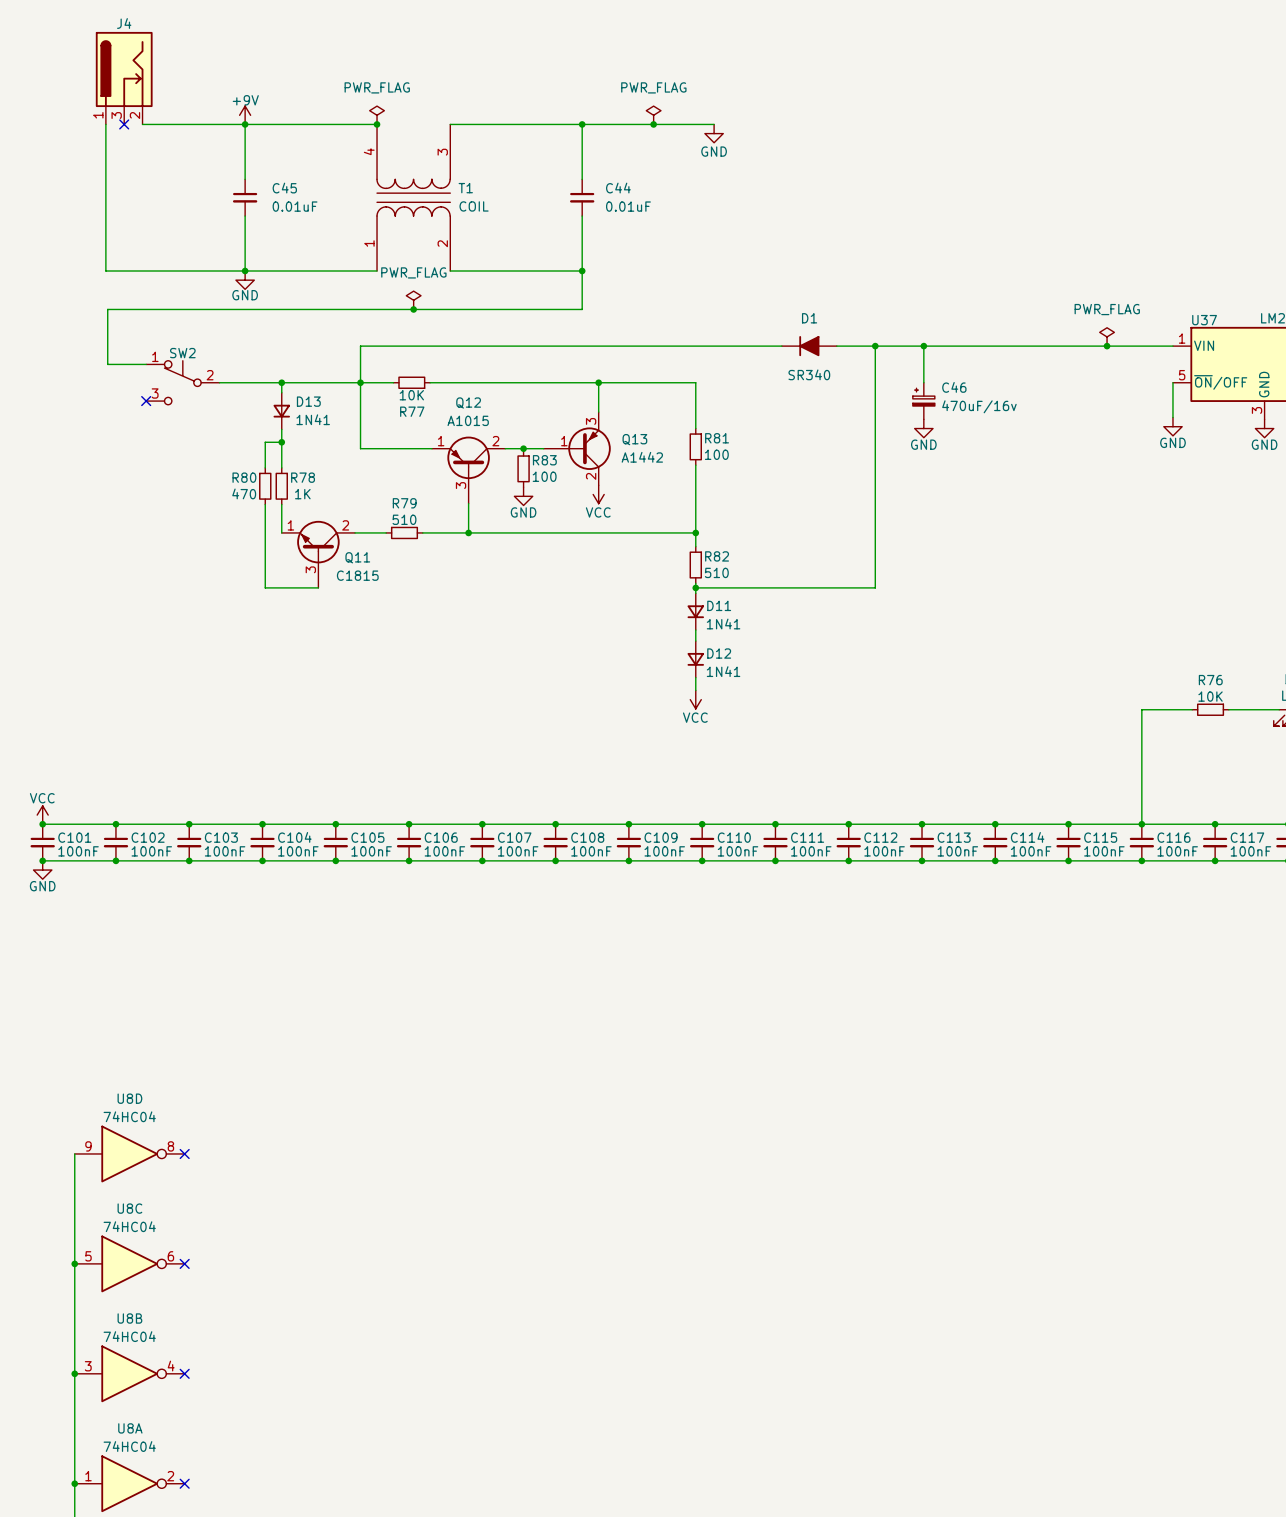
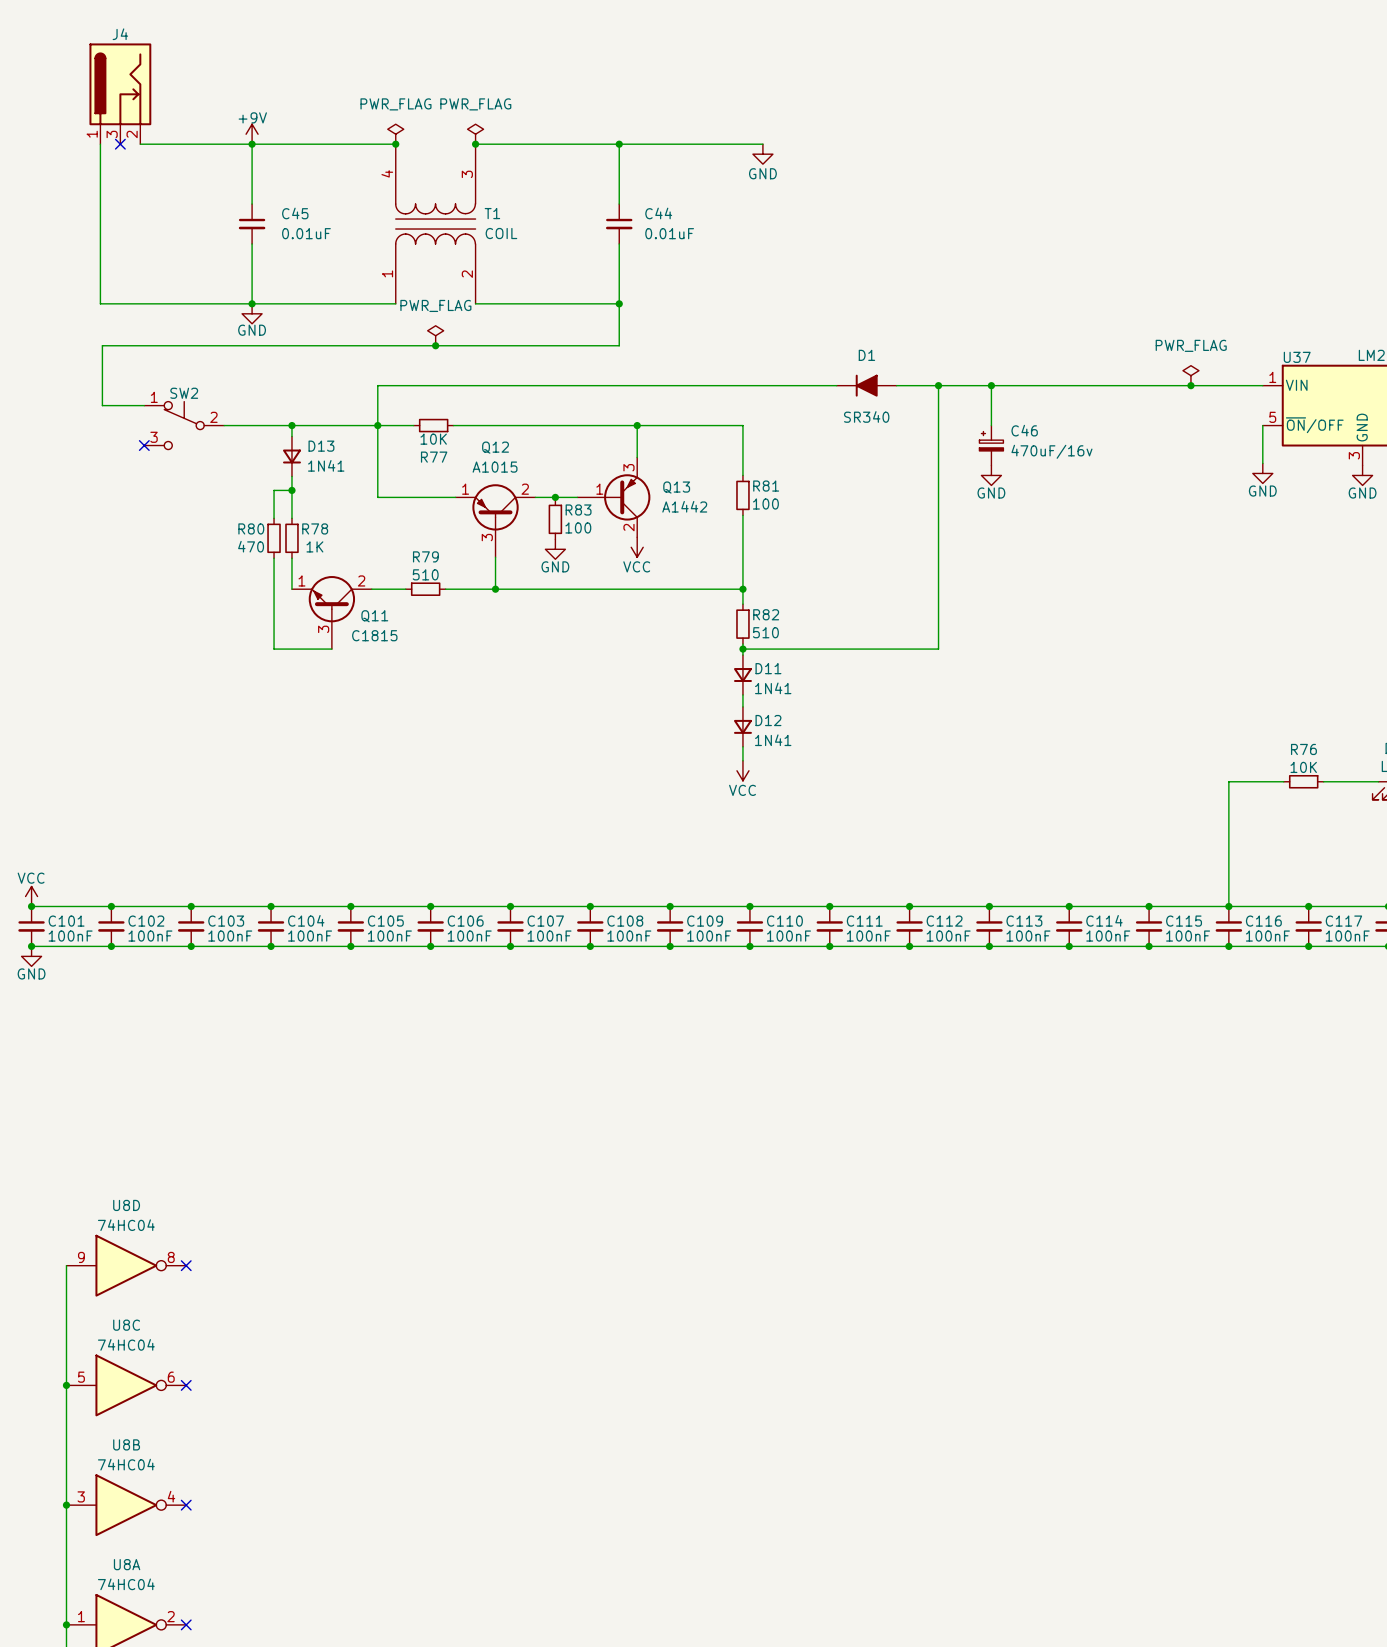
power symbol: none -> PWR_FLAG (475, 134)
power symbol: PWR_FLAG (653, 115) -> none
junction: none -> (475, 144)
junction: (653, 124) -> none

